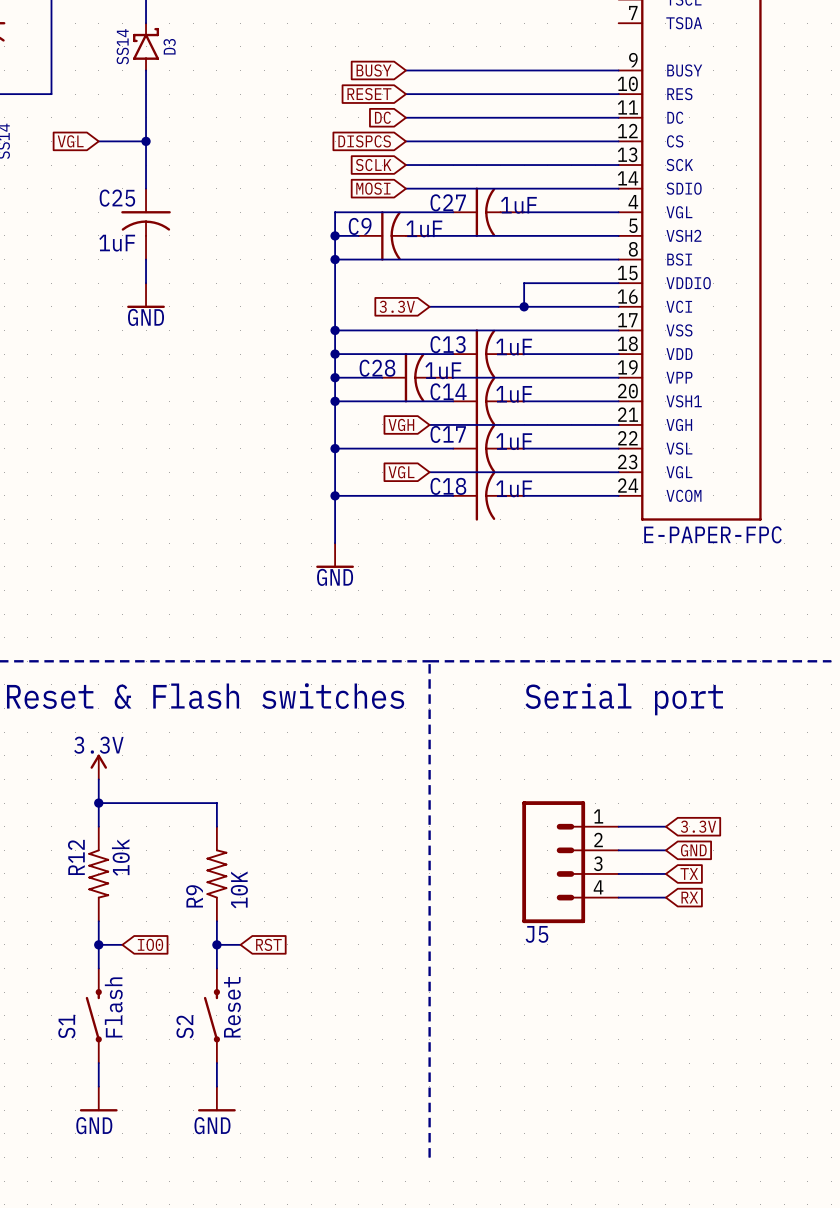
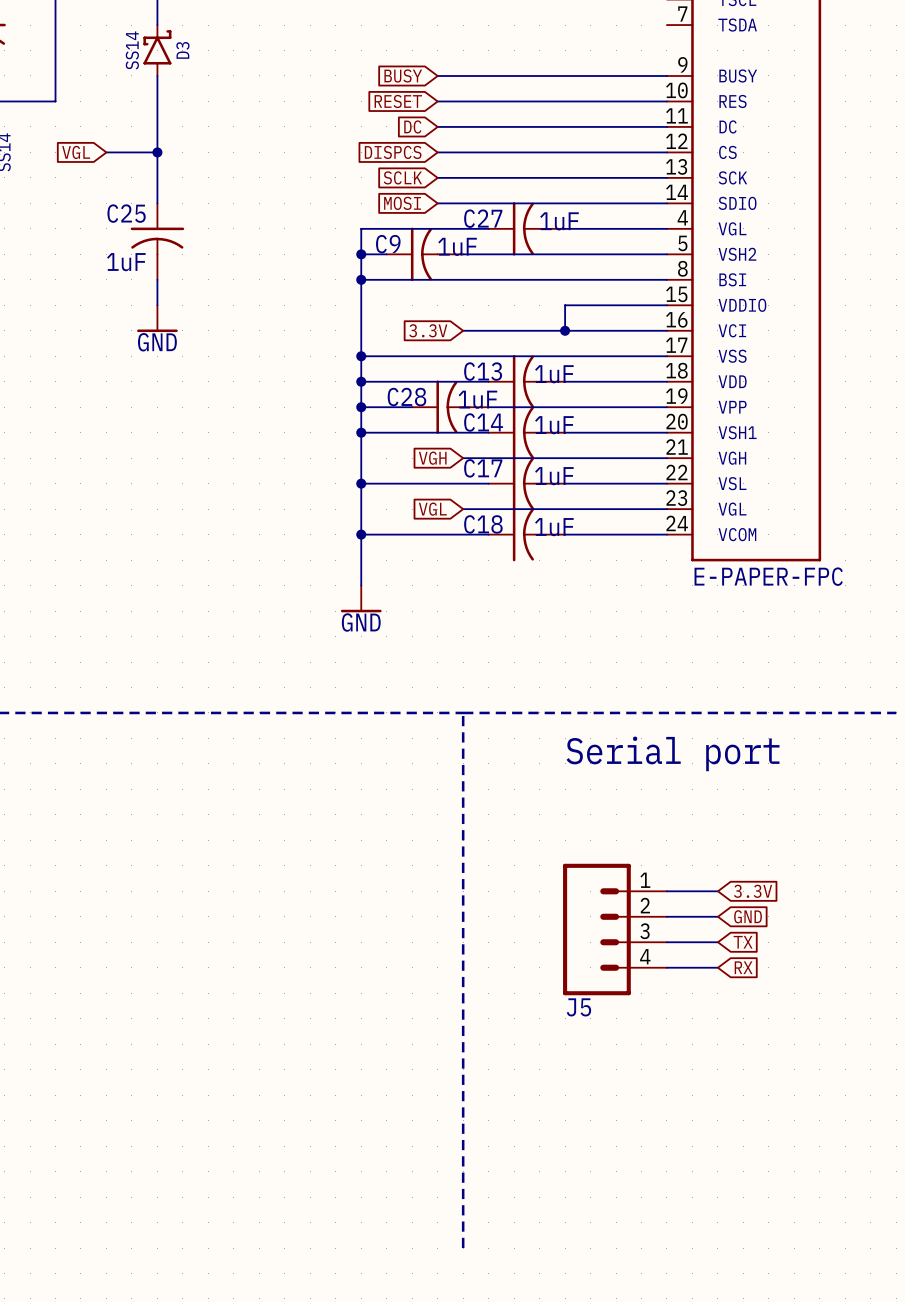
text: Reset & Flash switches (205, 696) -> none
power symbol: 3.3V (98, 767) -> none
wire: (98, 779) (98, 826) -> none
wire: (98, 803) (216, 803) (216, 826) -> none
junction: (98, 803) -> none
R12: 10k (98, 873) -> none
R9: 10K (216, 873) -> none
wire: (98, 921) (98, 968) -> none
wire: (216, 921) (216, 968) -> none
wire: (98, 944) (122, 944) -> none
junction: (98, 944) -> none
global label: IO0 (150, 944) -> none
wire: (216, 944) (240, 944) -> none
junction: (216, 944) -> none
global label: RST (268, 944) -> none
S1: Flash (93, 1015) -> none
S2: Reset (211, 1015) -> none
wire: (98, 1063) (98, 1086) -> none
wire: (216, 1063) (216, 1086) -> none
power symbol: GND (98, 1099) -> none
power symbol: GND (216, 1099) -> none

